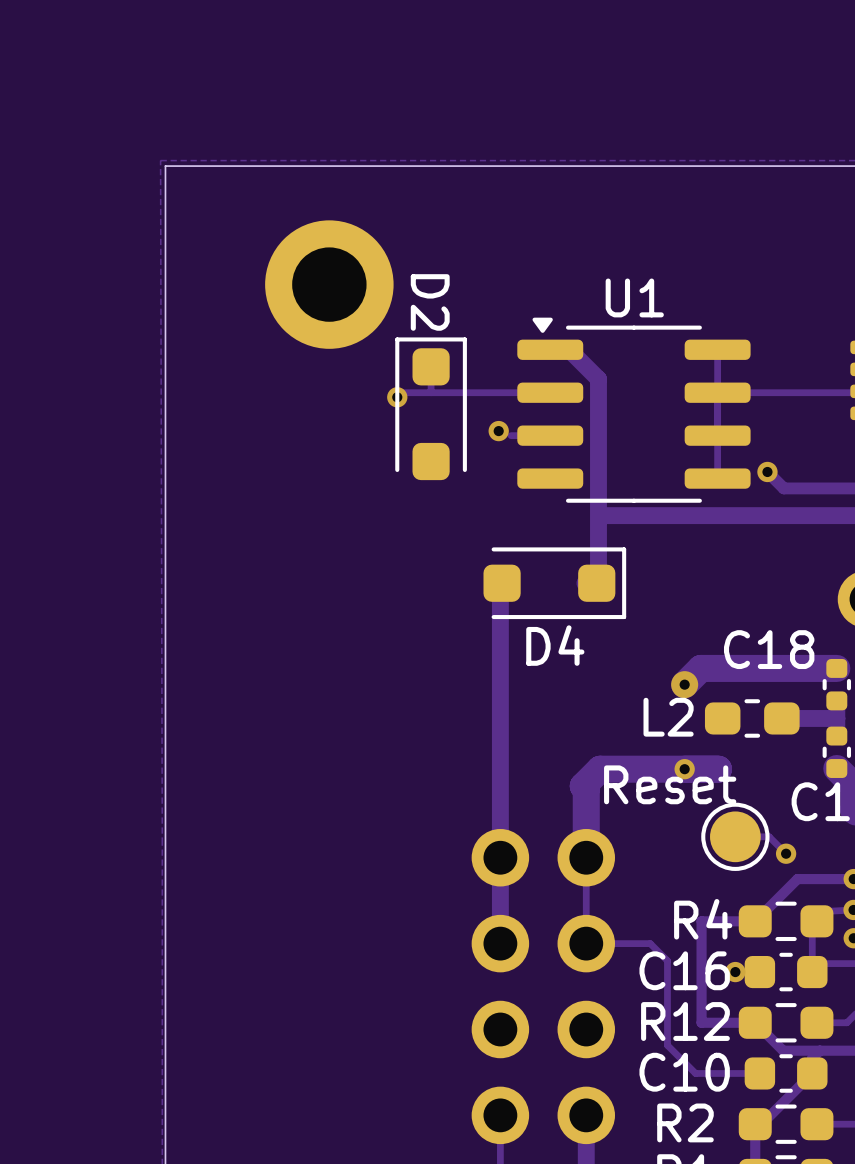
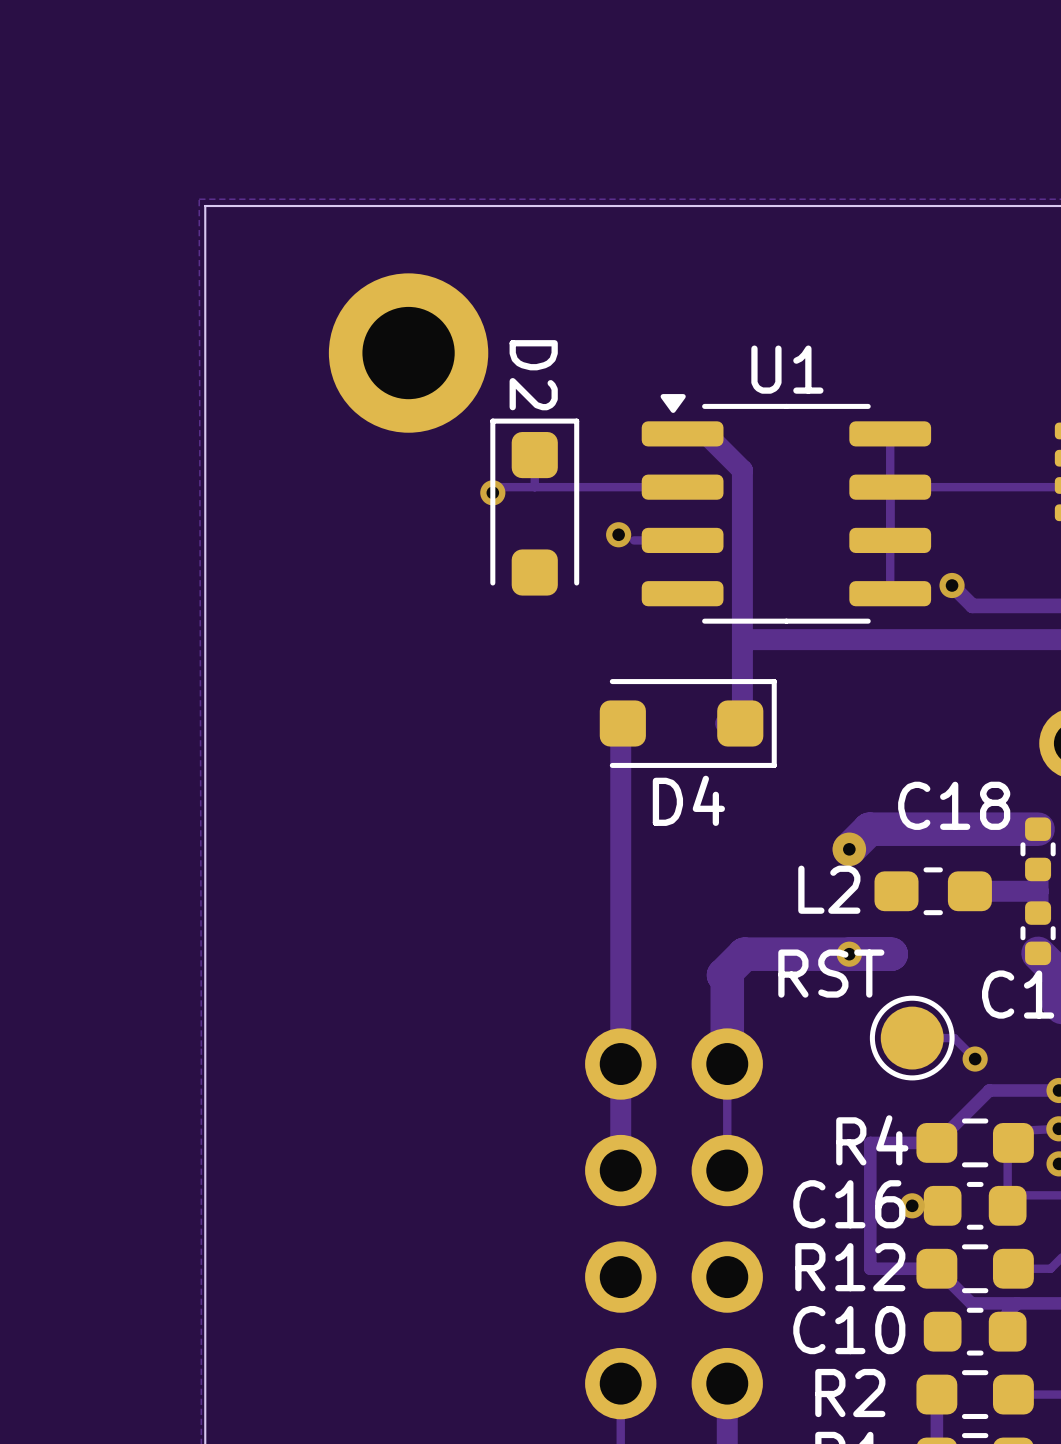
part value: Reset (670, 784) -> RST (831, 973)
track: (586, 943) (650, 943) (667, 960) (667, 1045) (695, 1073) (759, 1073) -> none
track: (812, 1073) (761, 1124) -> none

